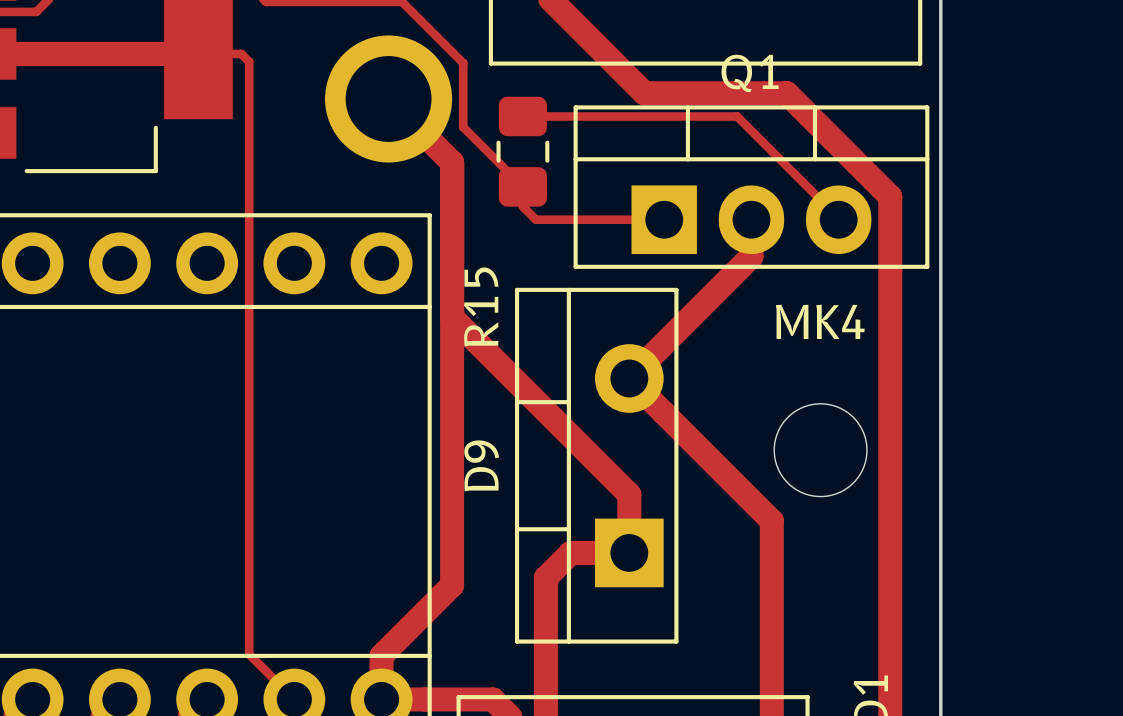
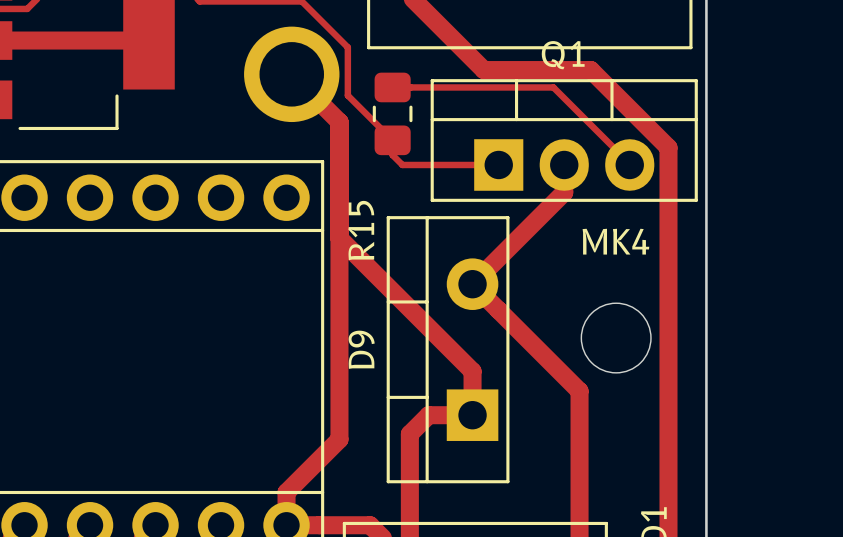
track: (198, 53) (241, 53) (249, 61) (249, 654) (294, 699) -> none

